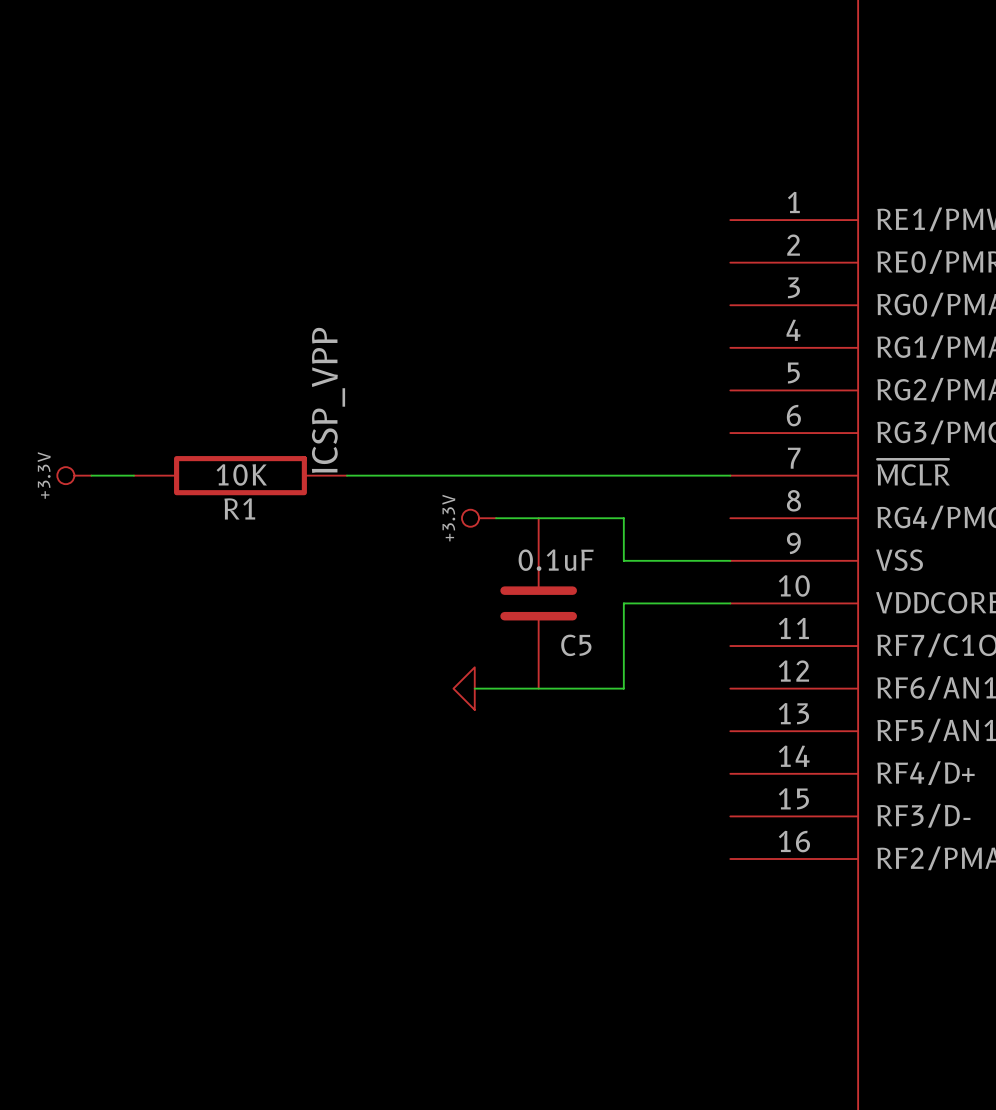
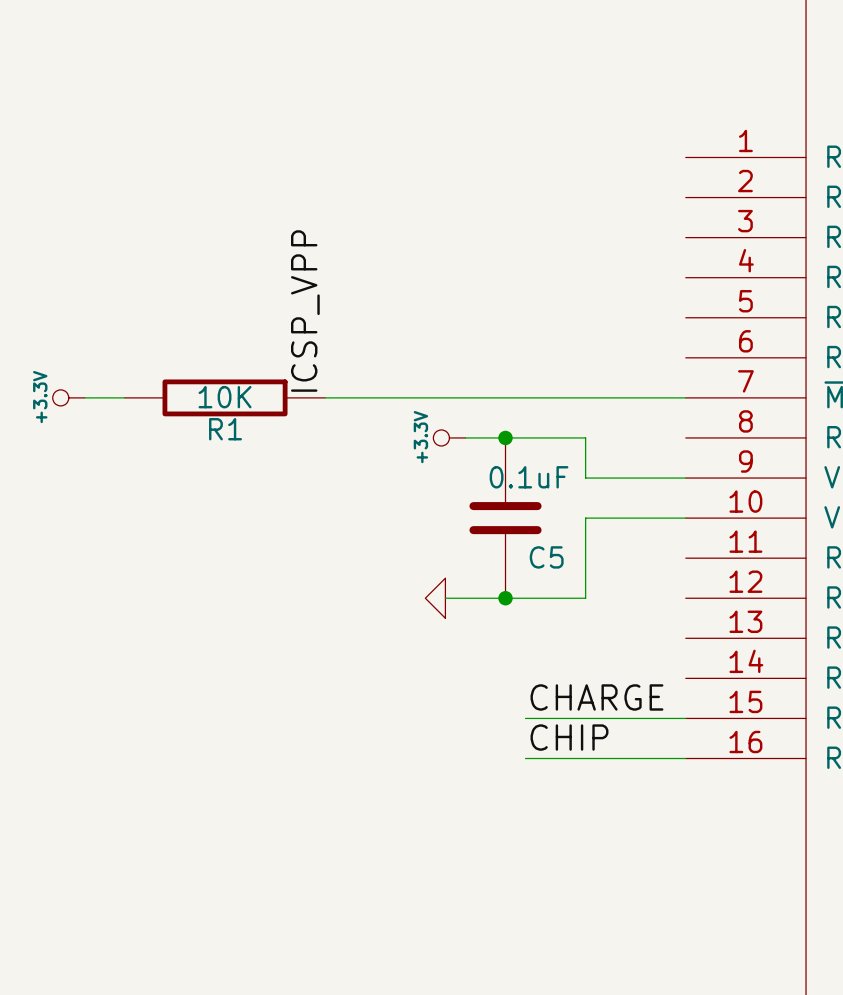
junction: none -> (505, 437)
junction: none -> (505, 598)
label: none -> CHARGE (596, 697)
wire: none -> (525, 718) (685, 718)
label: none -> CHIP (569, 737)
wire: none -> (525, 758) (685, 758)

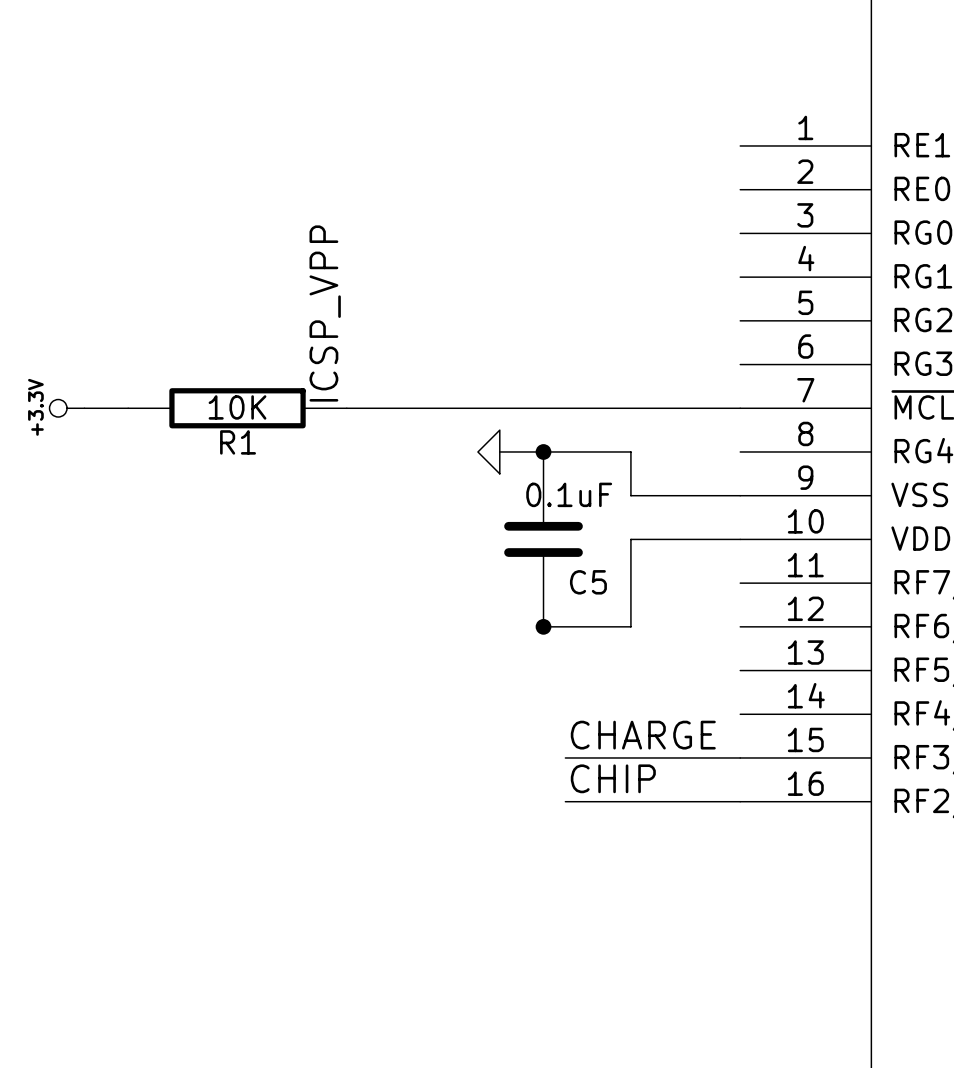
power symbol shape: [433, 429, 466, 446] -> [477, 430, 500, 474]
power symbol text: +3.3V (420, 437) -> none
power symbol: (435, 598) -> none
wire: (445, 598) (505, 598) -> none

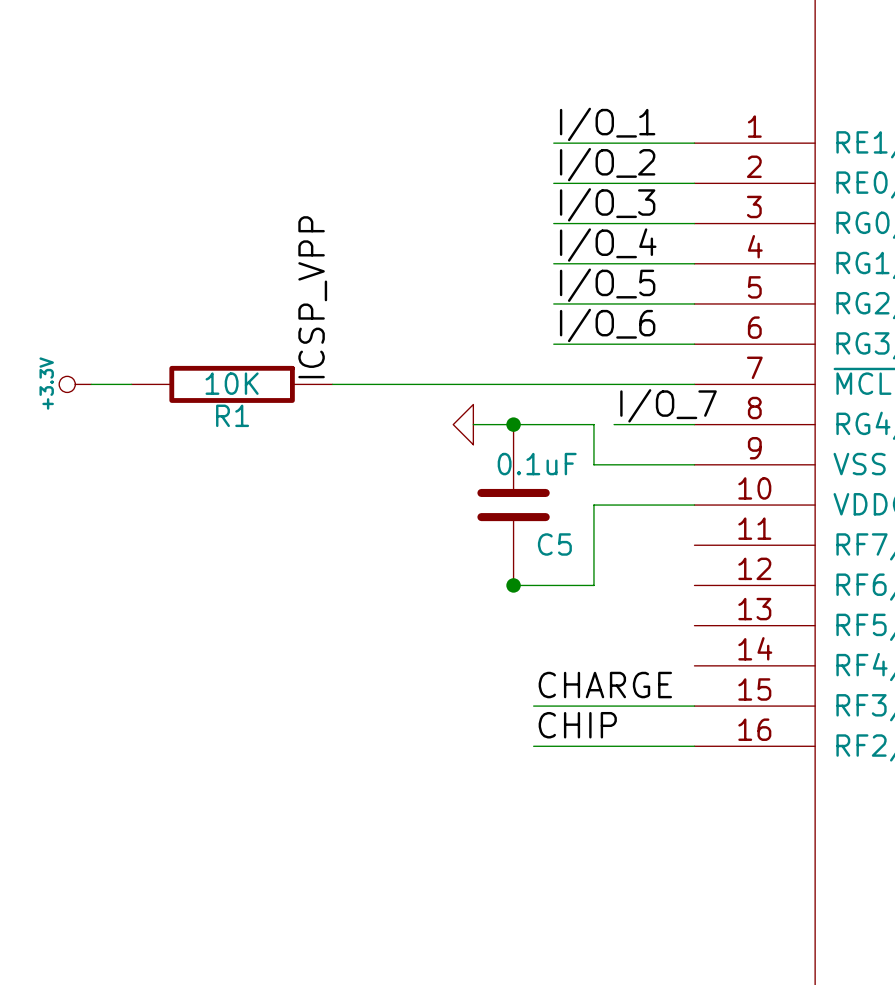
label: none -> I/O_1 (607, 124)
wire: none -> (553, 143) (694, 143)
label: none -> I/O_2 (607, 164)
wire: none -> (553, 183) (694, 183)
label: none -> I/O_3 (607, 204)
wire: none -> (553, 223) (694, 223)
label: none -> I/O_4 (608, 245)
wire: none -> (553, 263) (694, 263)
label: none -> I/O_5 (607, 285)
wire: none -> (553, 303) (694, 303)
label: none -> I/O_6 (607, 325)
wire: none -> (553, 344) (694, 344)
label: none -> I/O_7 (668, 405)
wire: none -> (614, 424) (694, 424)

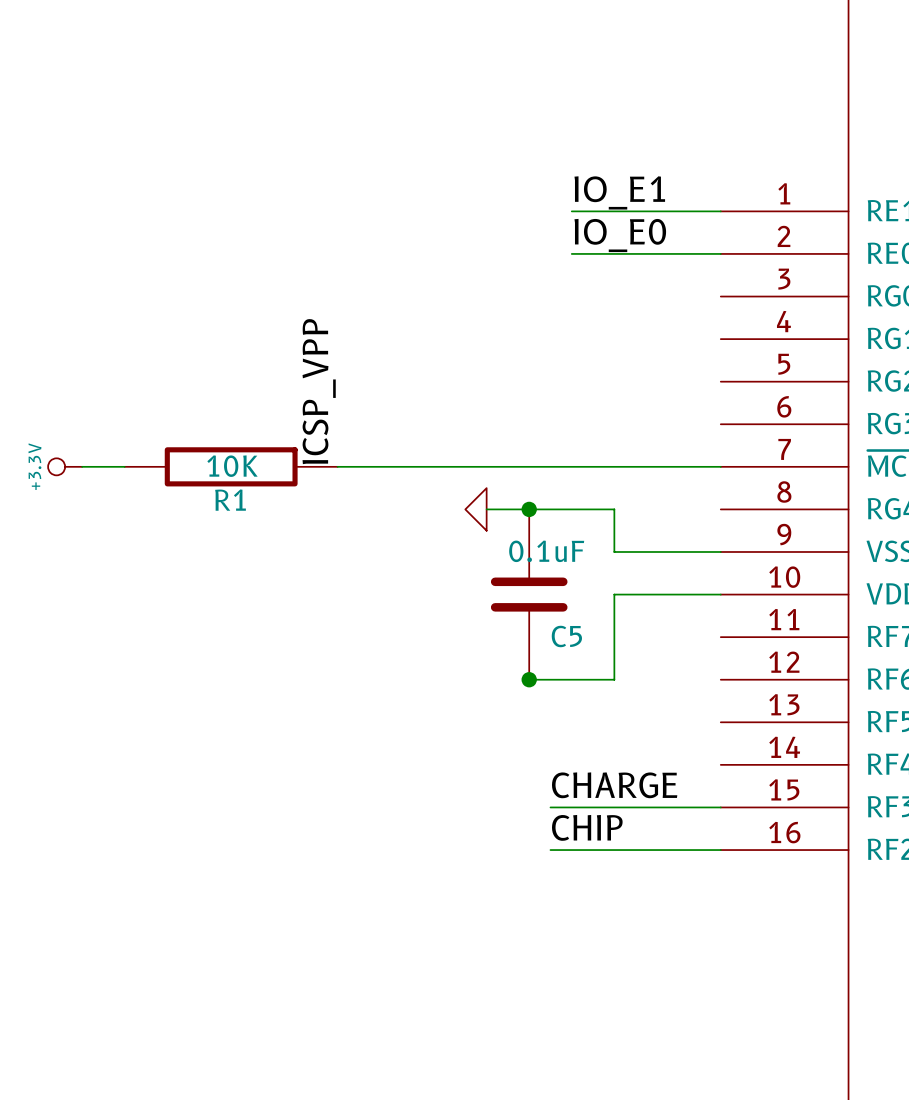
label: I/O_1 (607, 124) -> IO_E1 (619, 192)
label: I/O_2 (607, 164) -> IO_E0 (620, 235)
label: I/O_3 (607, 204) -> none
wire: (553, 223) (694, 223) -> none
label: I/O_4 (608, 245) -> none
wire: (553, 263) (694, 263) -> none
label: I/O_5 (607, 285) -> none
wire: (553, 303) (694, 303) -> none
label: I/O_6 (607, 325) -> none
wire: (553, 344) (694, 344) -> none
label: I/O_7 (668, 405) -> none
wire: (614, 424) (694, 424) -> none

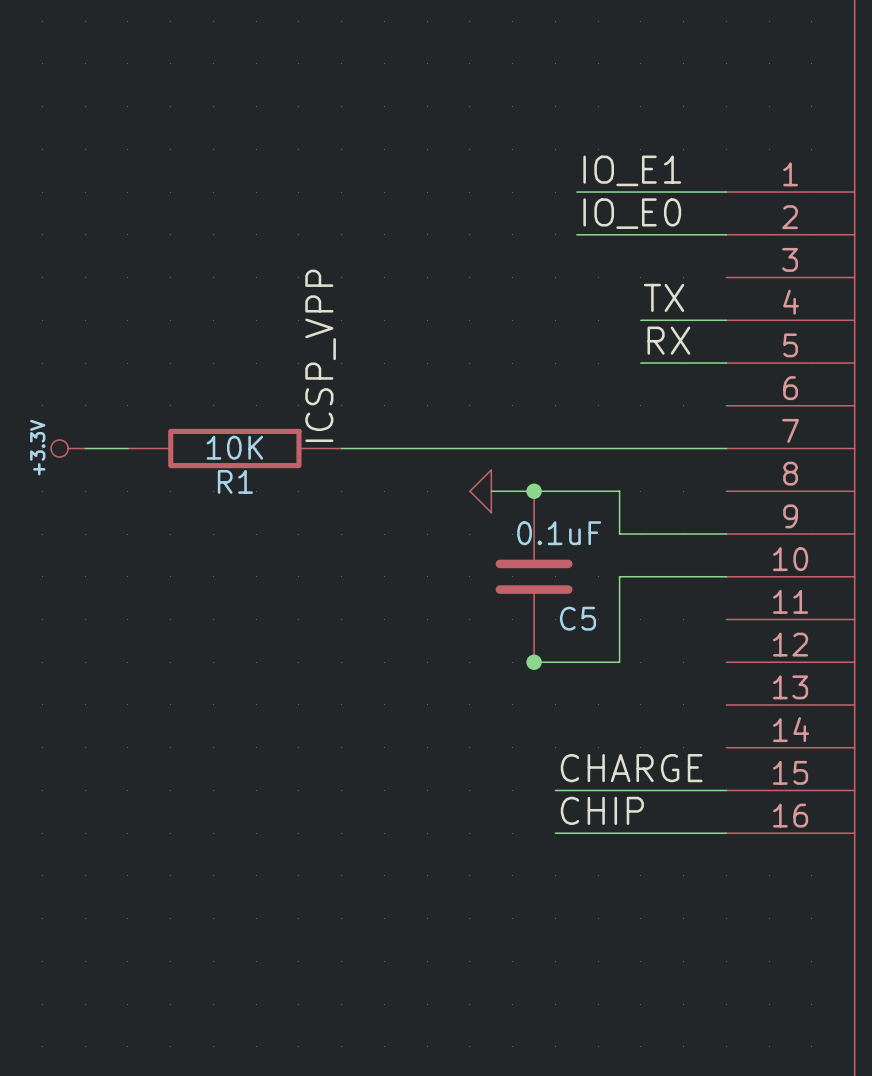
label: none -> TX (664, 297)
wire: none -> (640, 320) (726, 320)
label: none -> RX (668, 340)
wire: none -> (640, 363) (726, 363)

